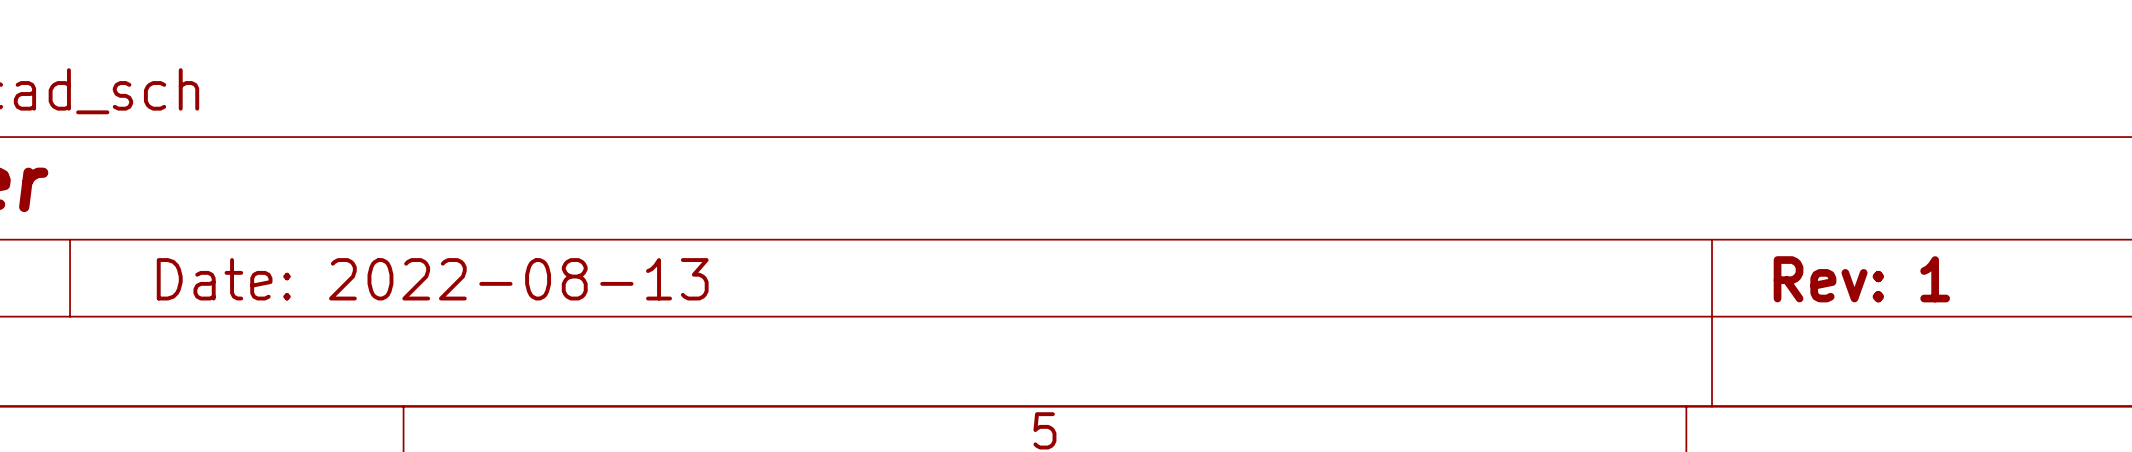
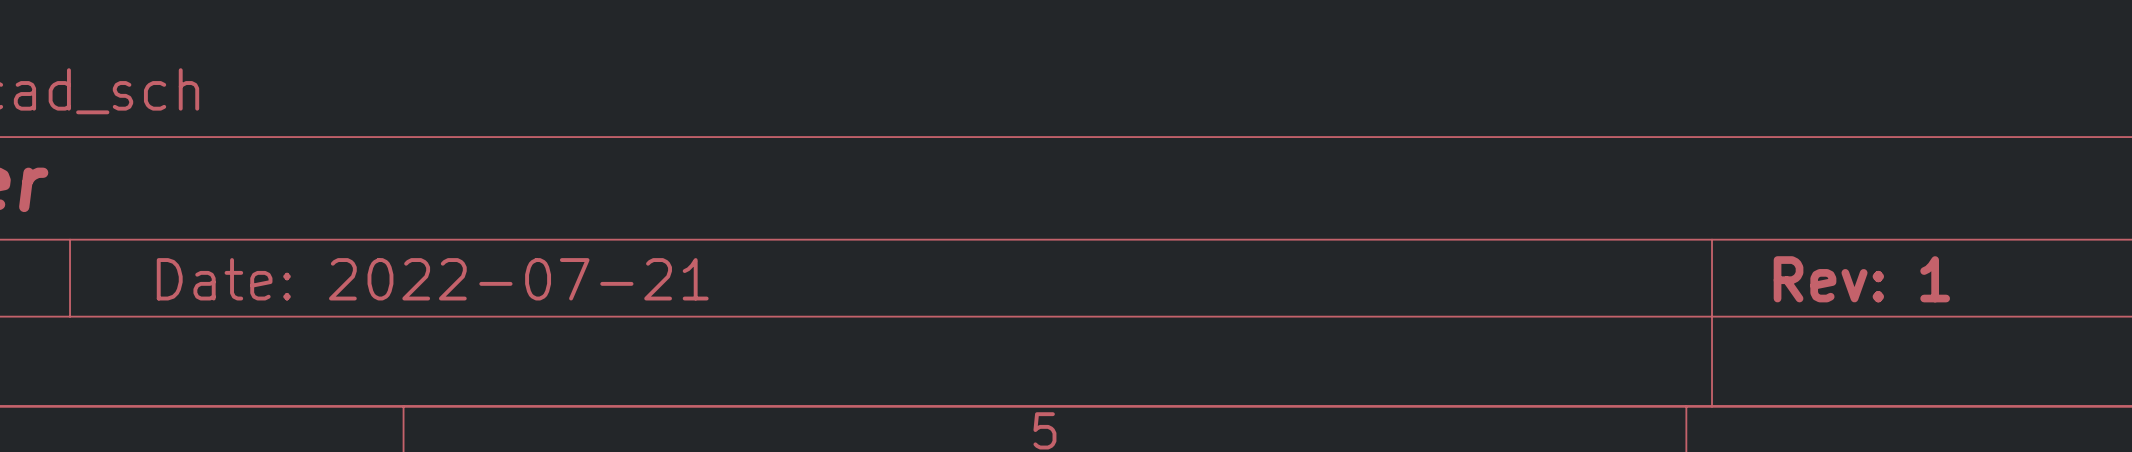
title block: Date: 2022-08-13 (432, 279) -> Date: 2022-07-21 (432, 279)

